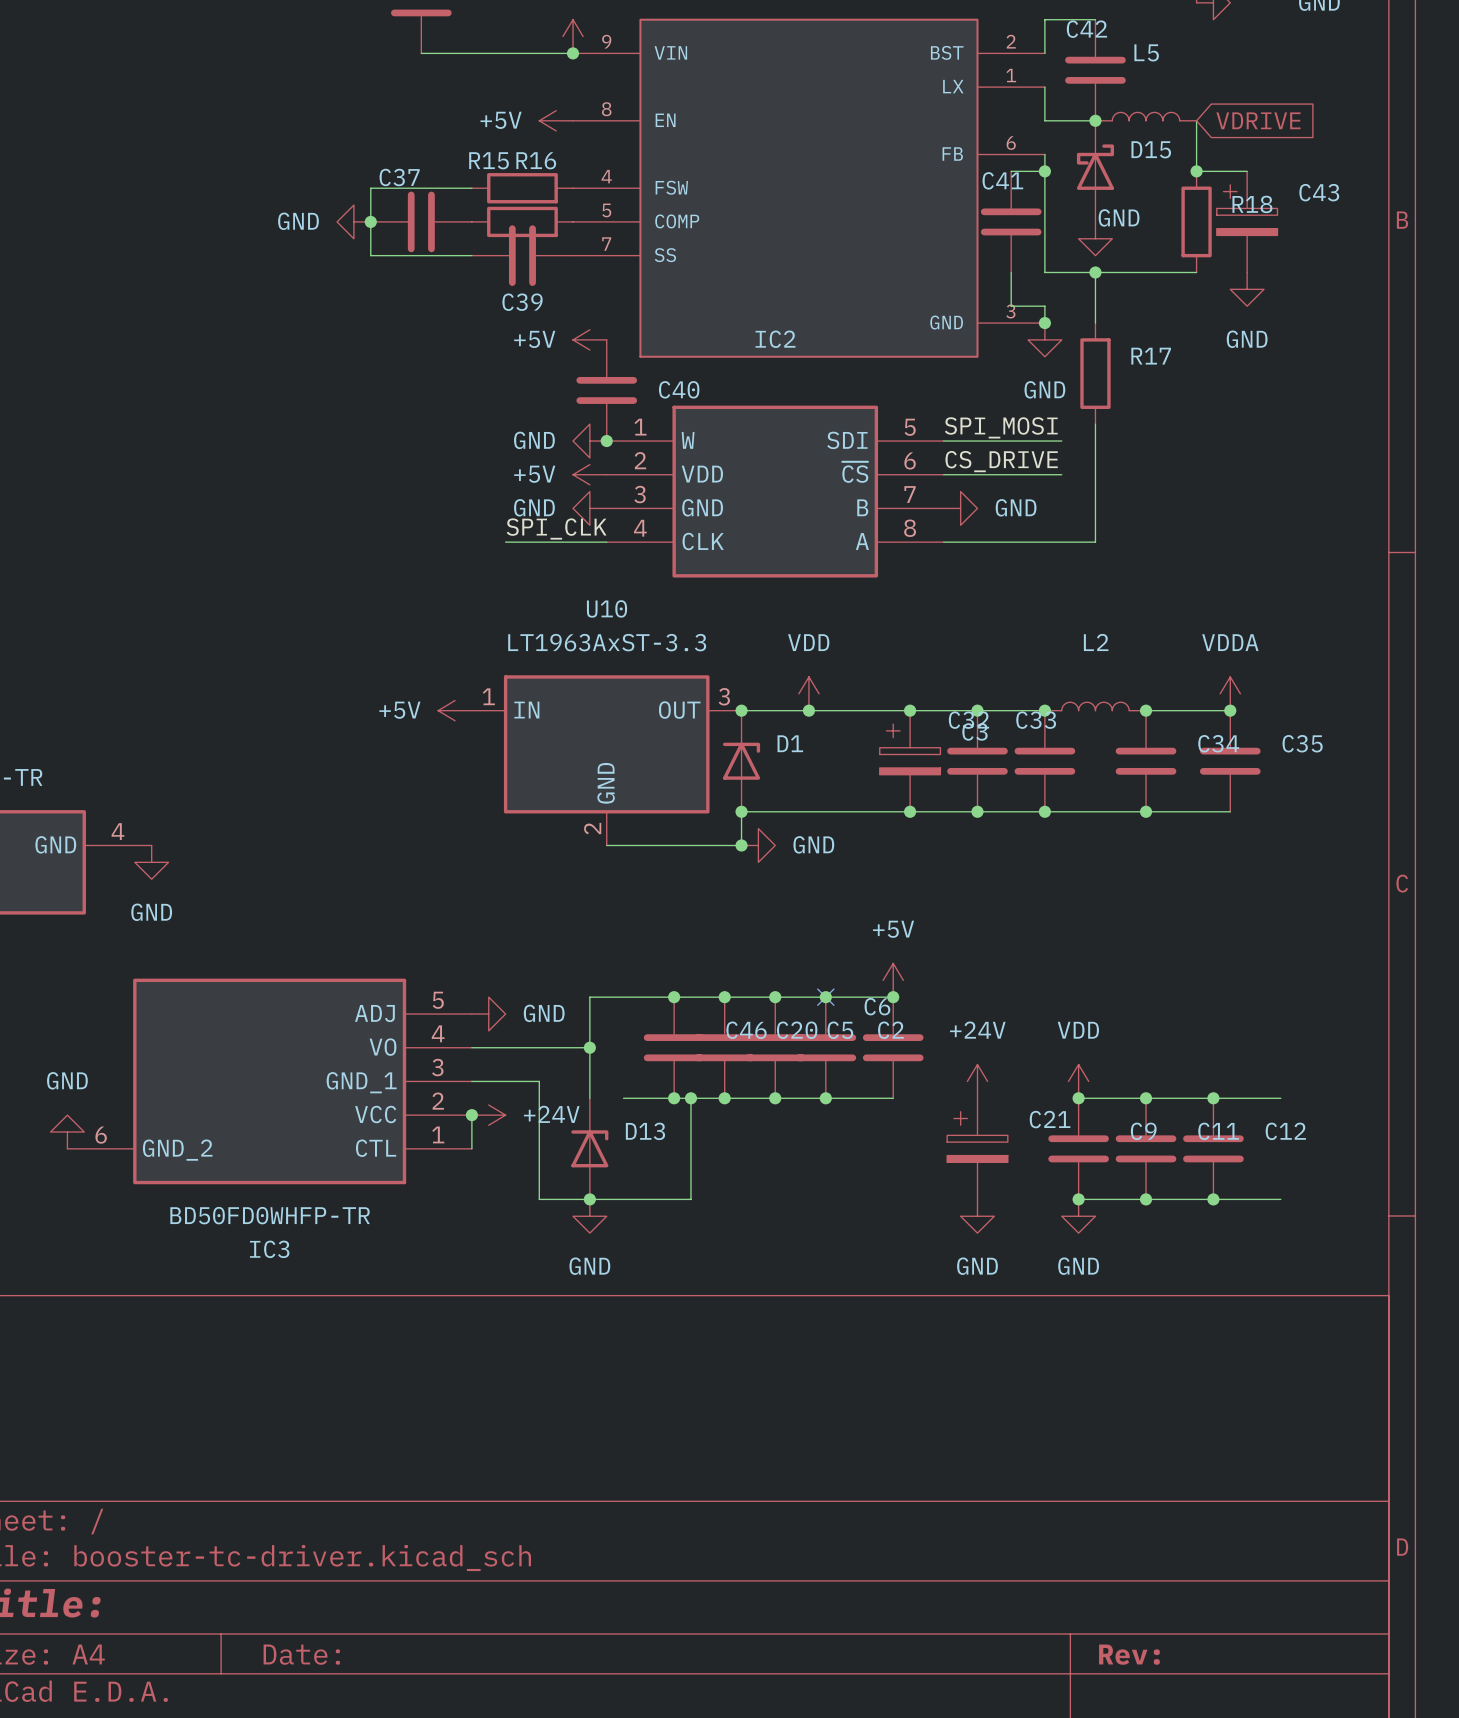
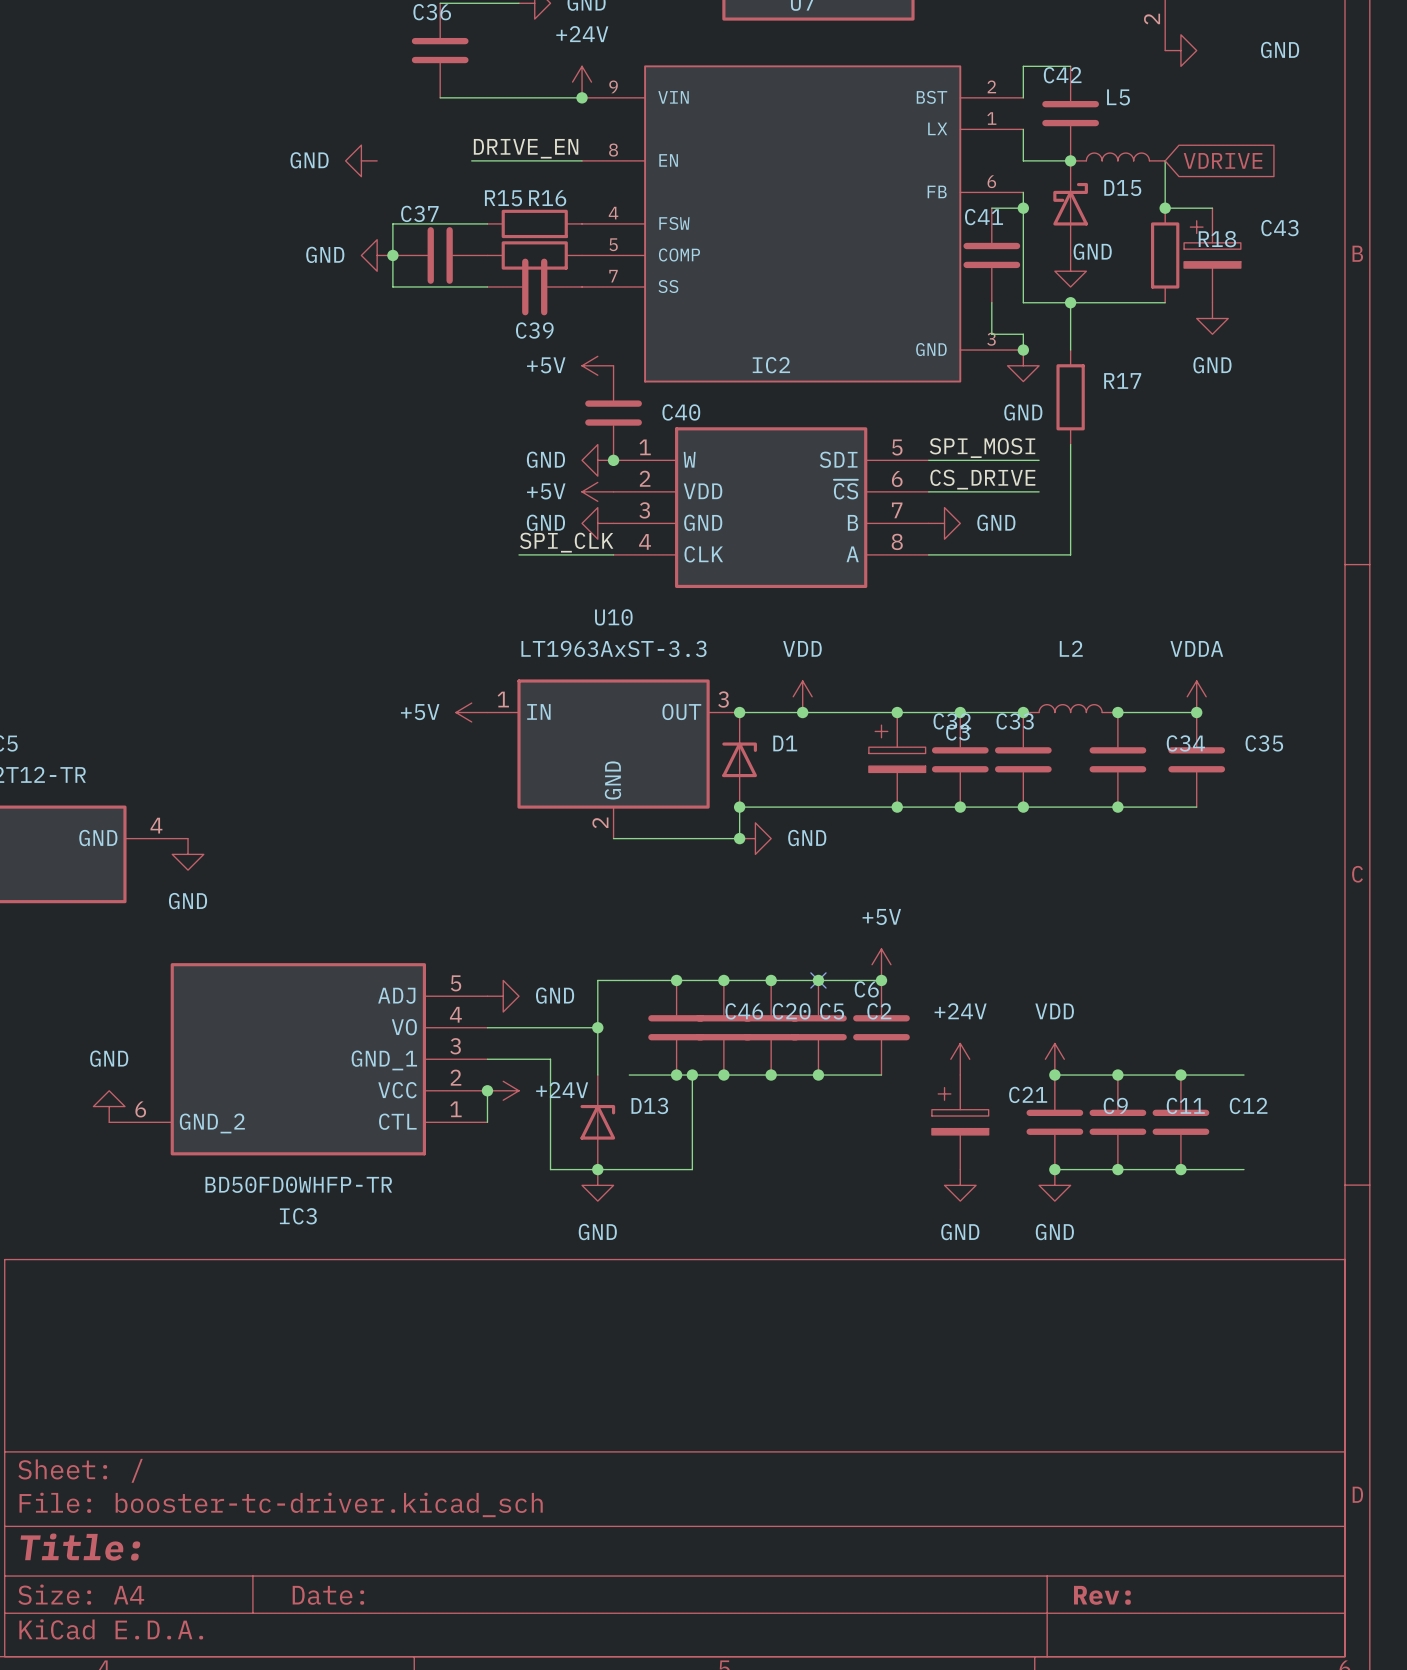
label: none -> DRIVE_EN (526, 148)
power symbol: none -> GND (361, 160)
wire: none -> (471, 160) (582, 160)
power symbol: +5V (556, 120) -> none

